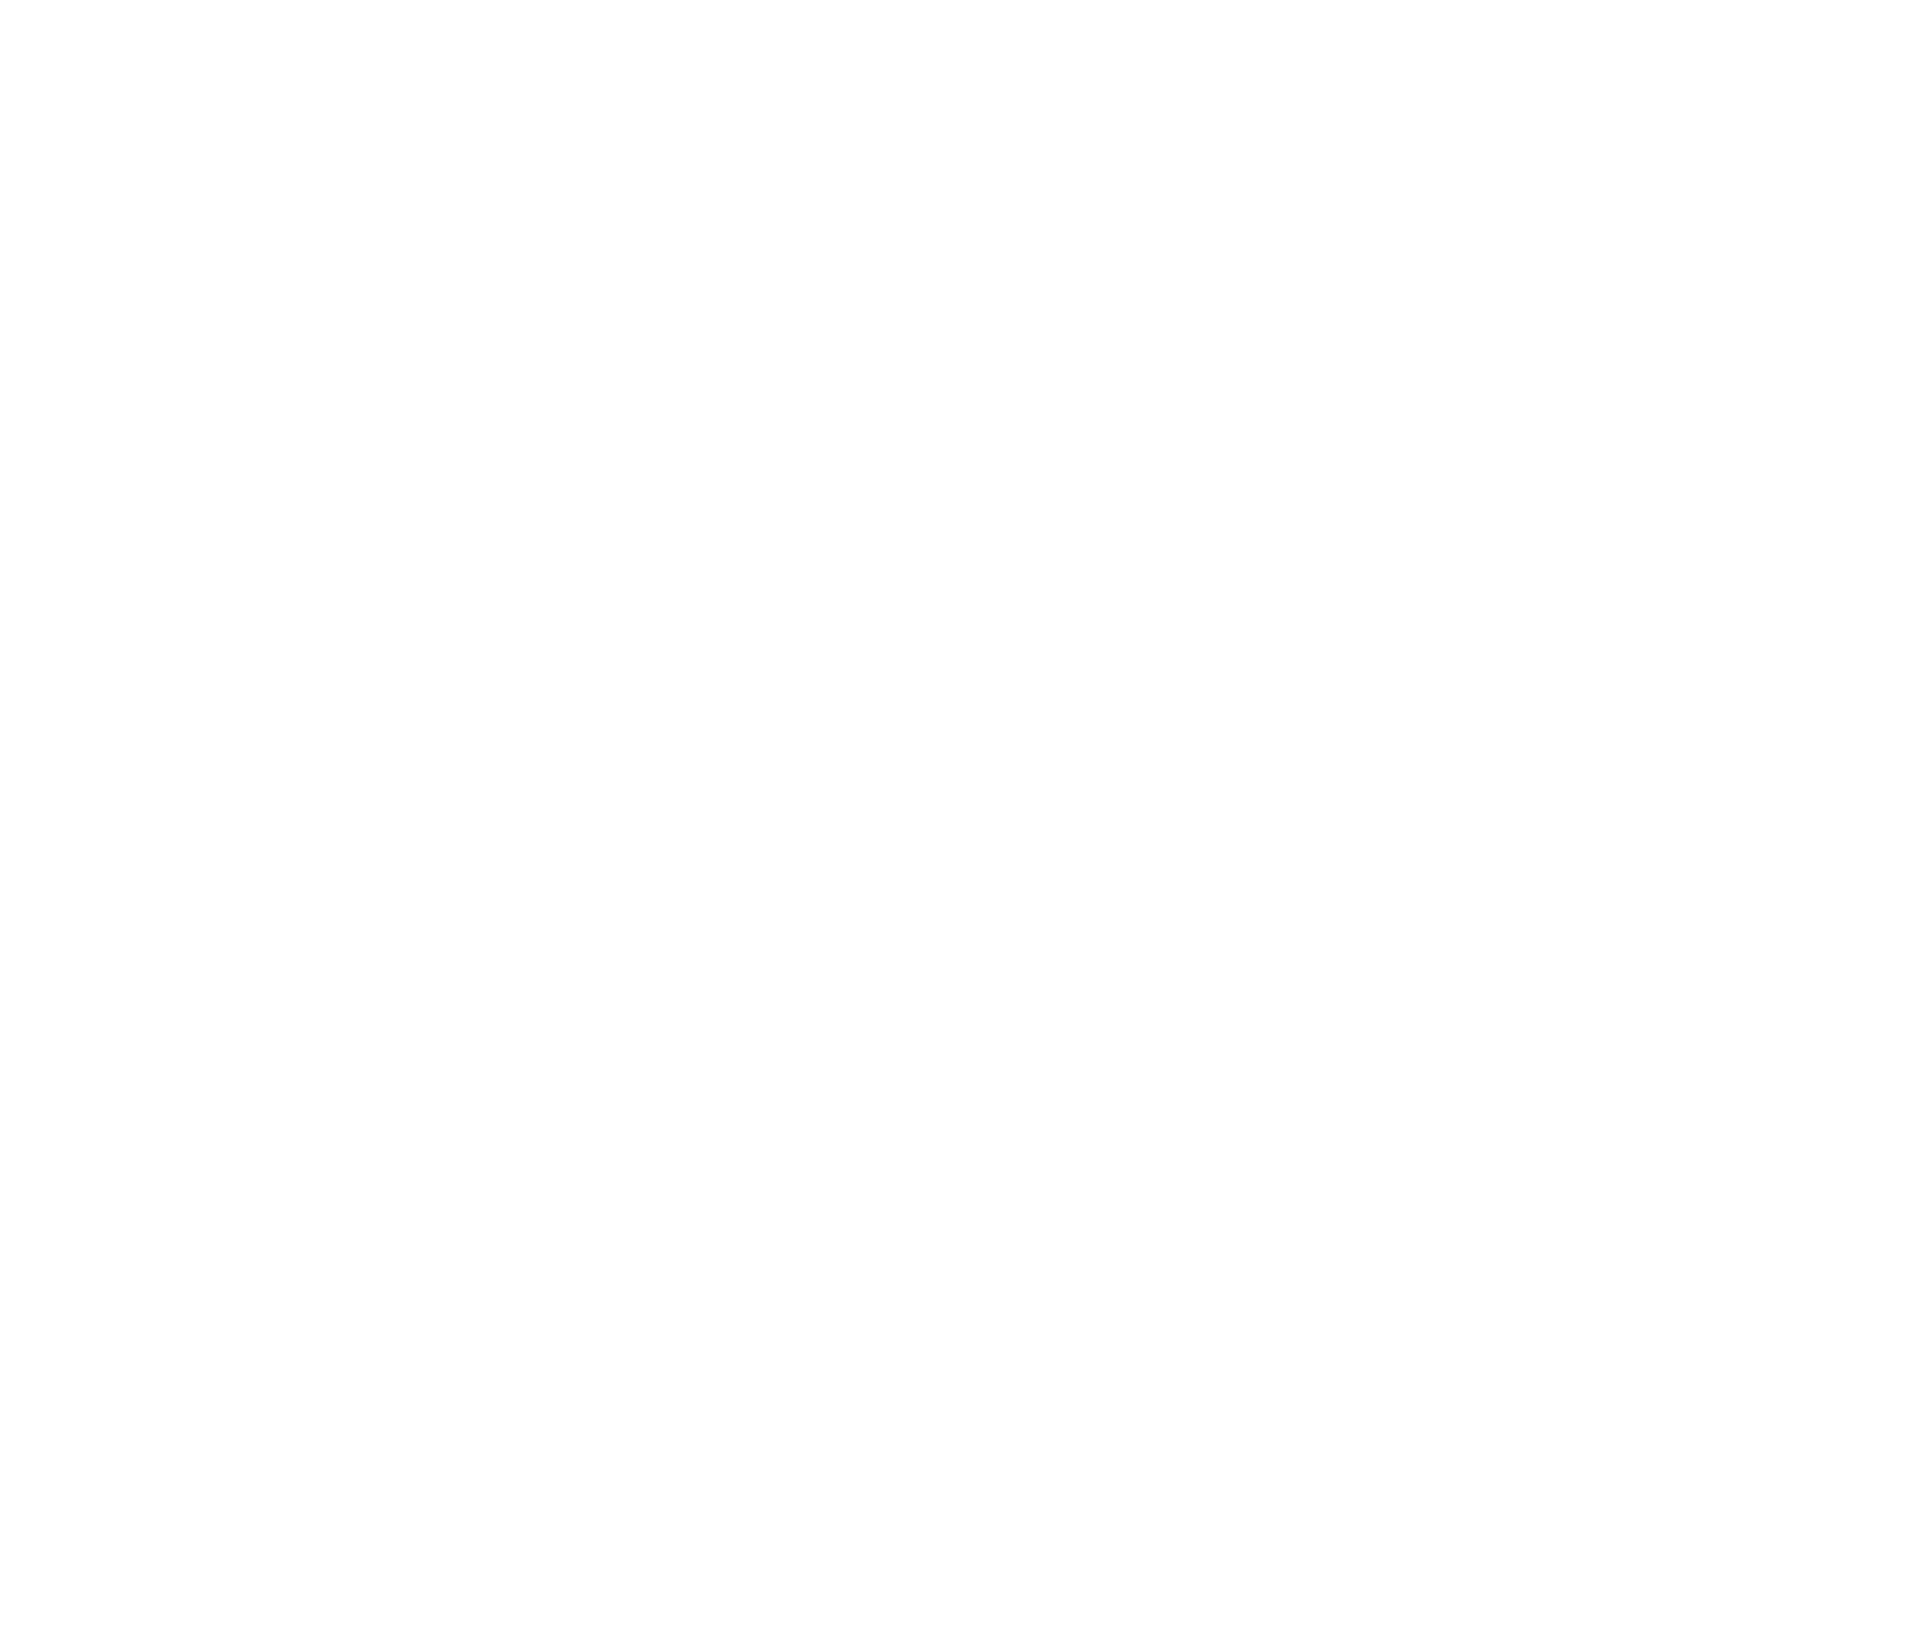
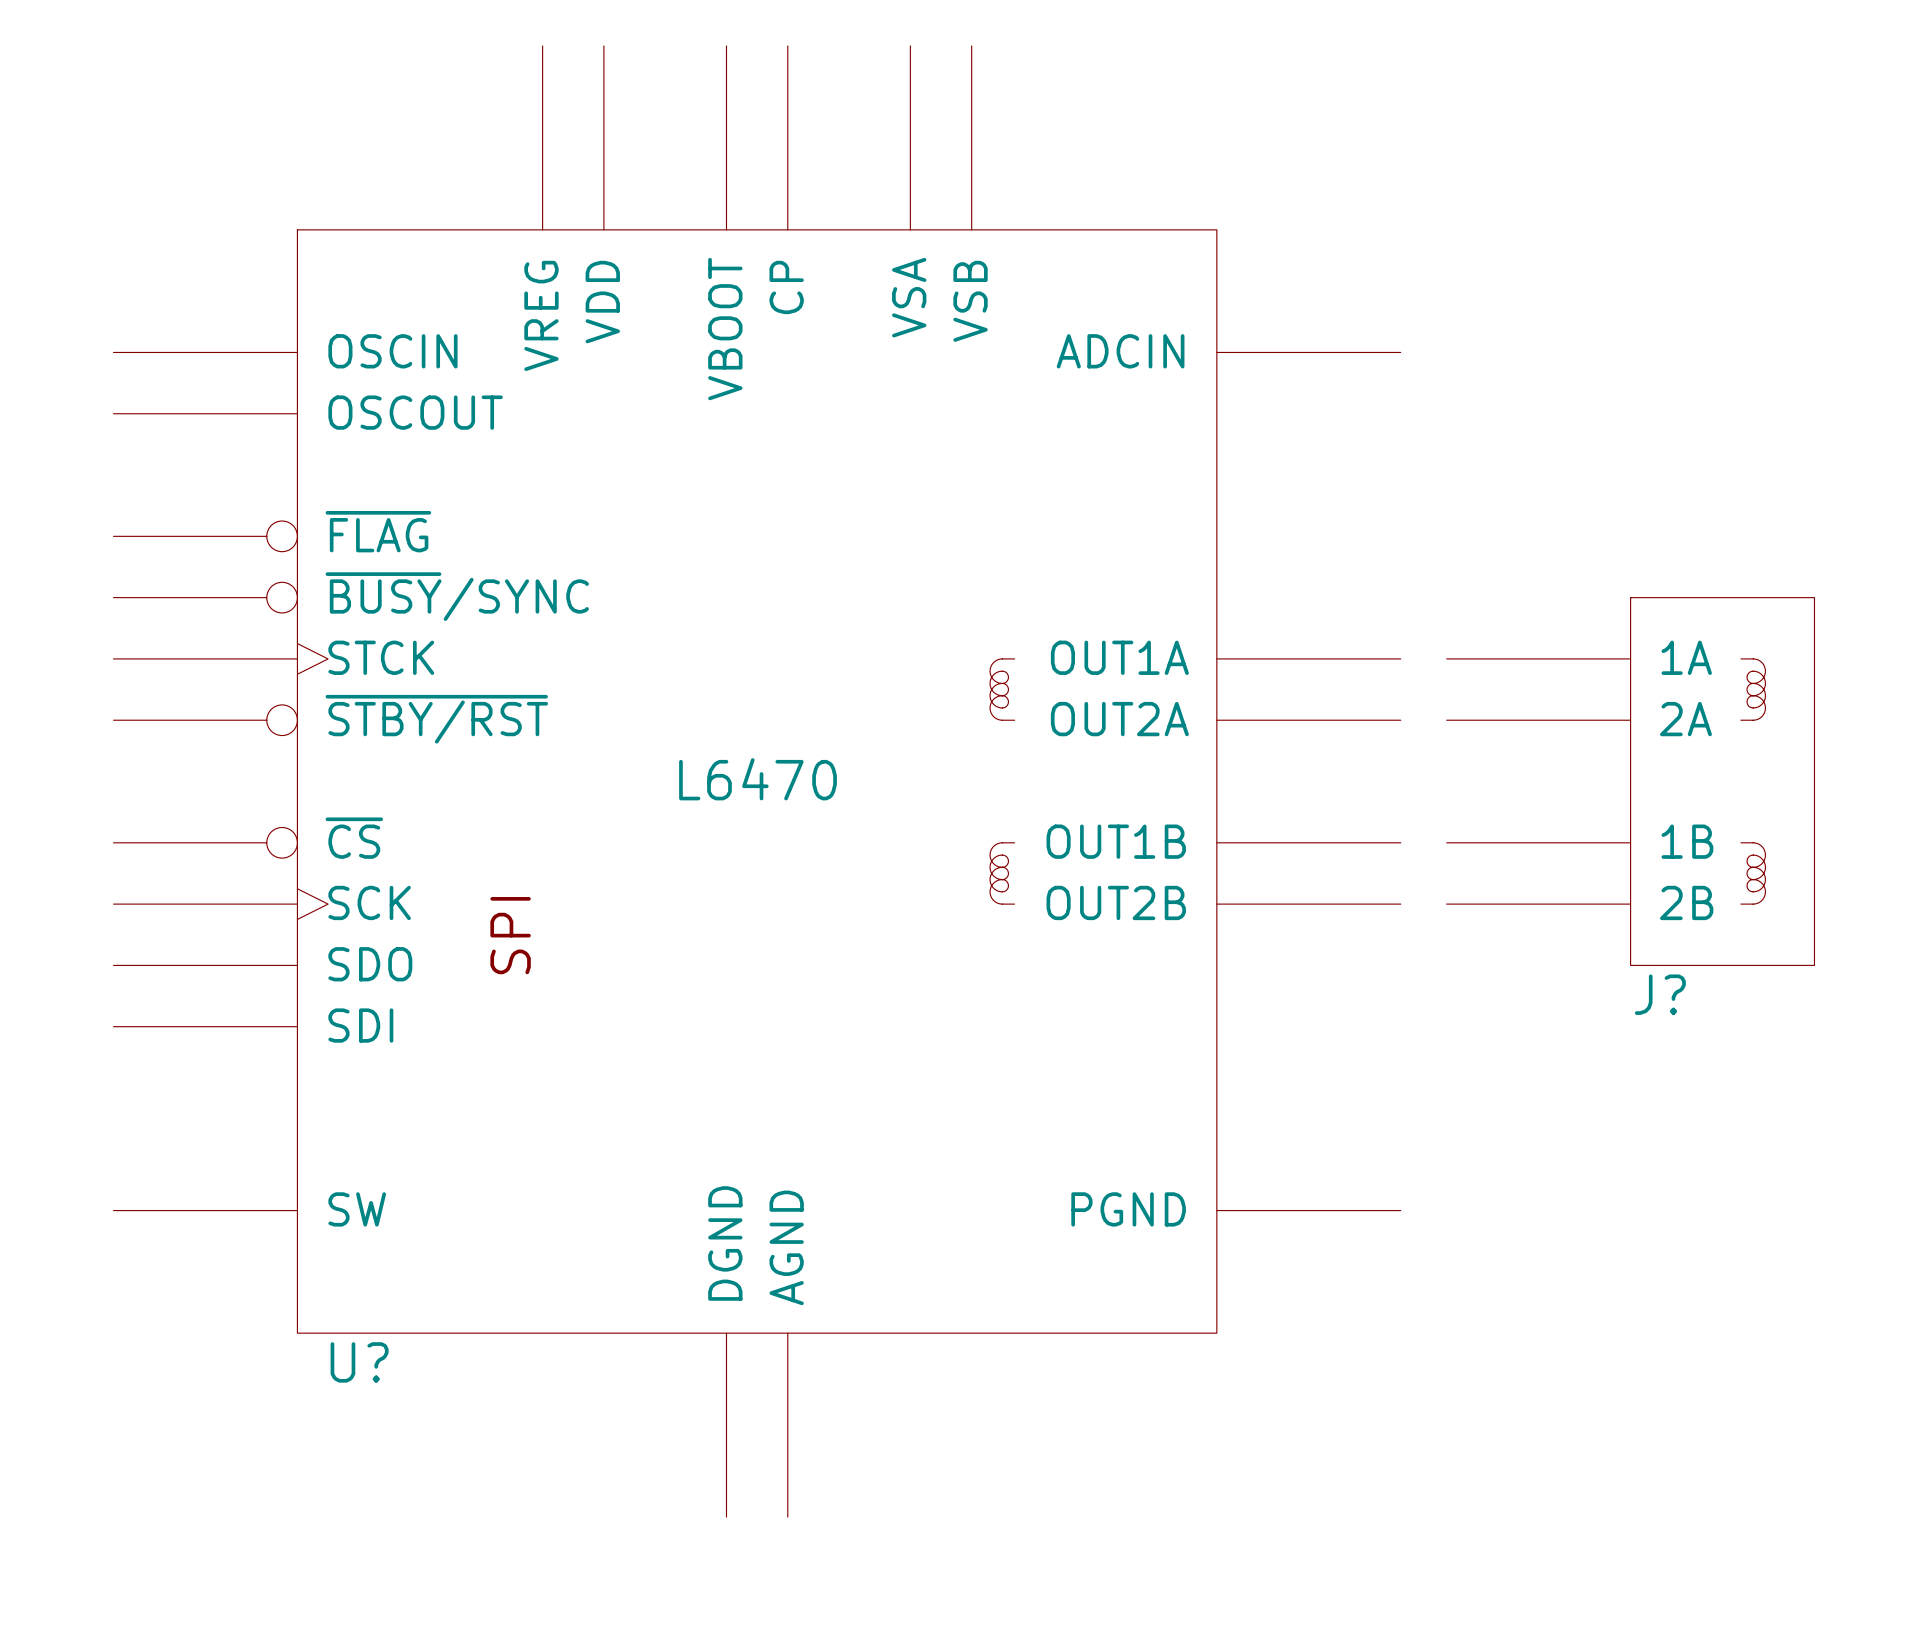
U?: none -> L6470 (757, 781)
J?: none -> (1630, 781)

